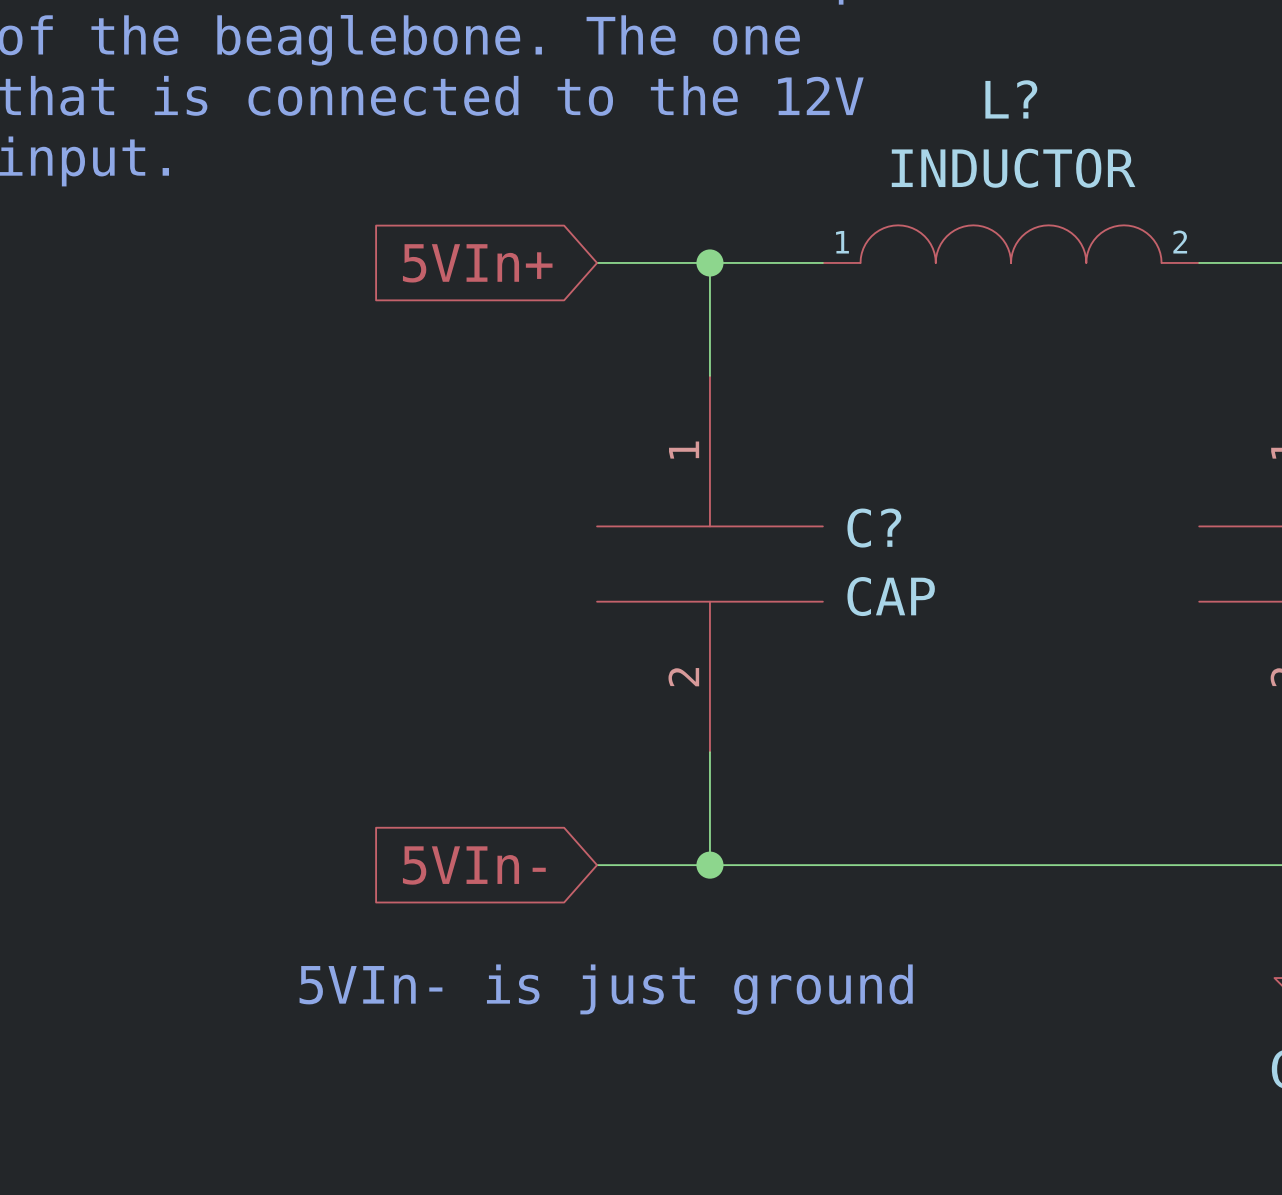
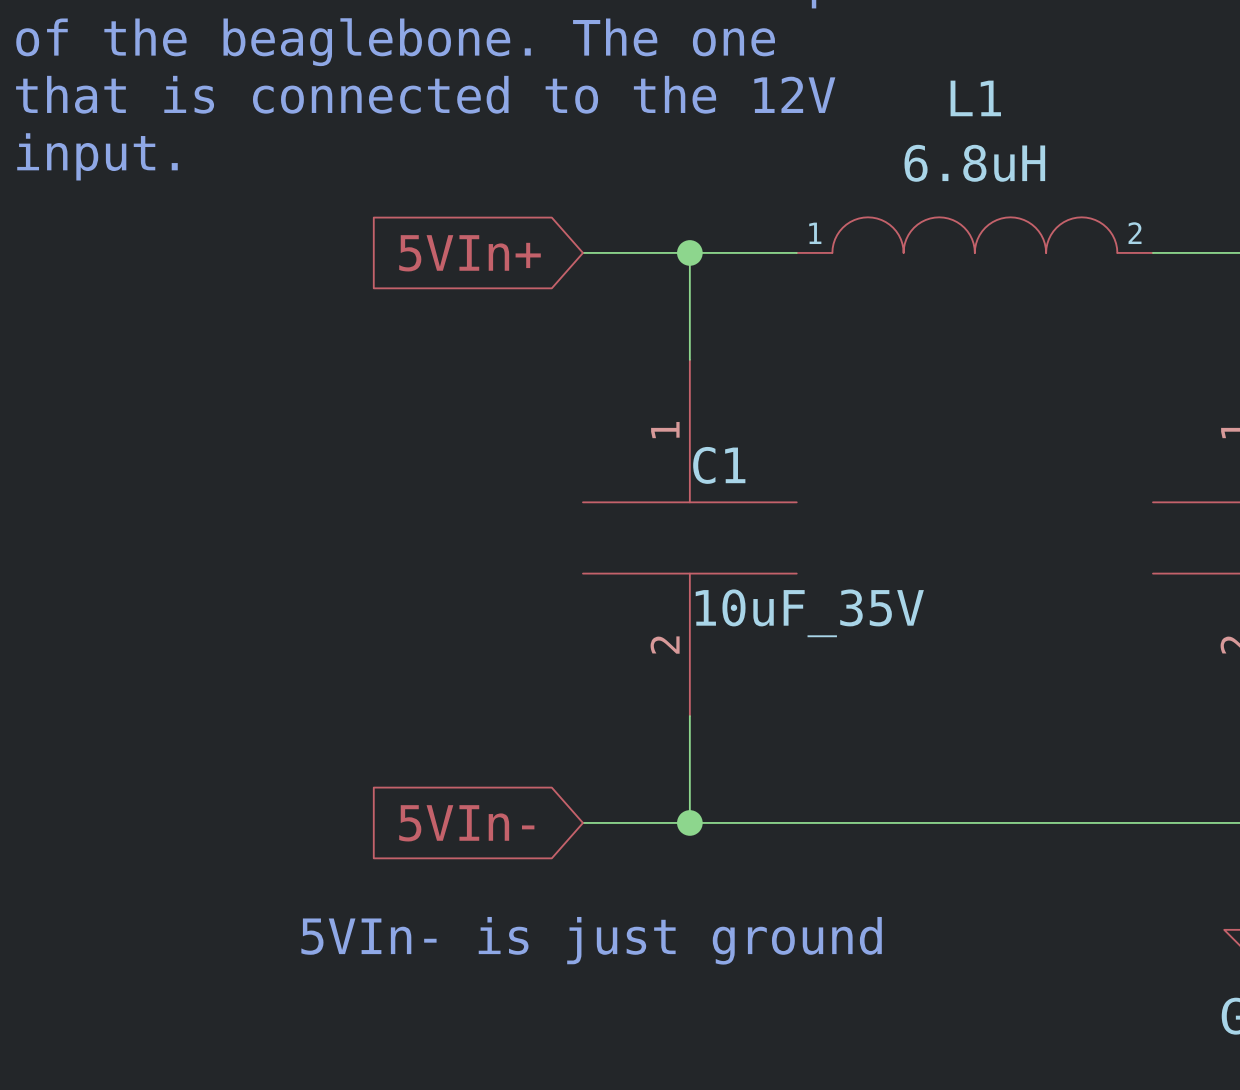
L? name: L? (1011, 99) -> L1 (975, 98)
L? value: INDUCTOR (1013, 168) -> 6.8uH (974, 163)
C? name: C? (874, 528) -> C1 (719, 465)
C? value: CAP (891, 596) -> 10uF_35V (809, 613)

